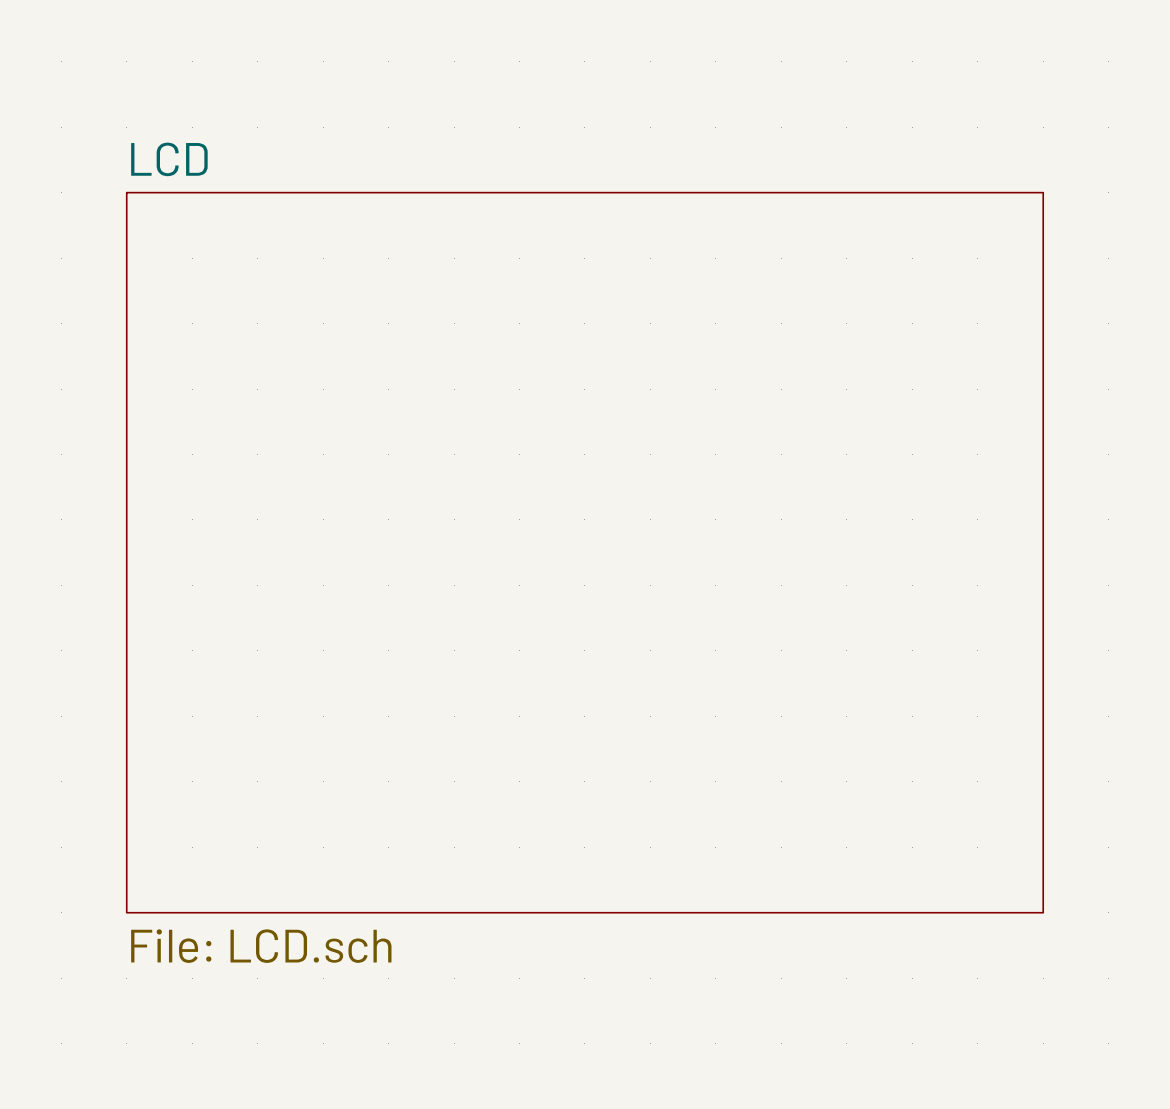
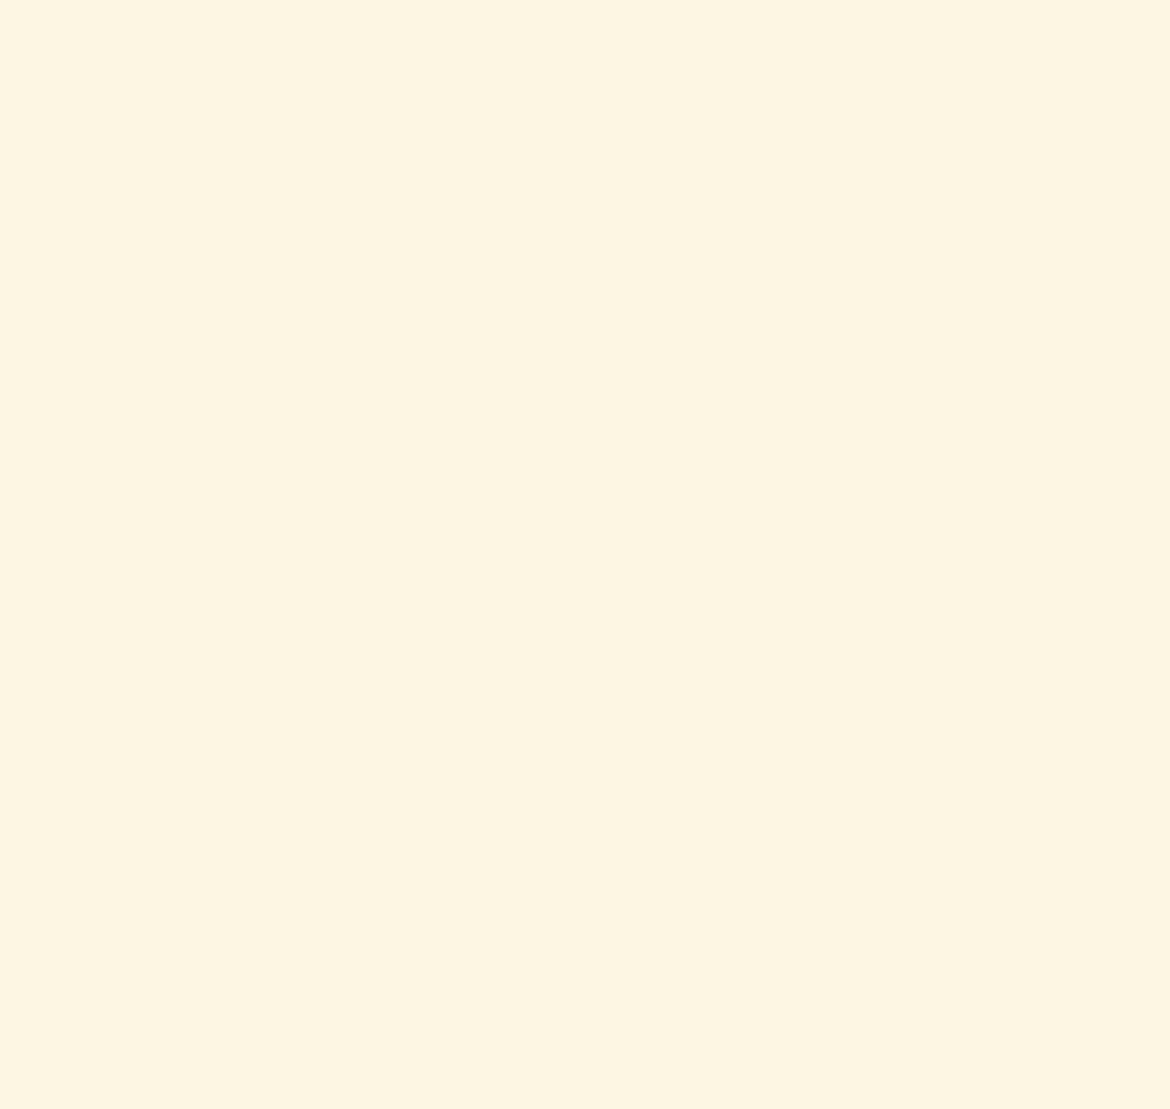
sheet LCD: File: LCD.sch (584, 552) -> none

